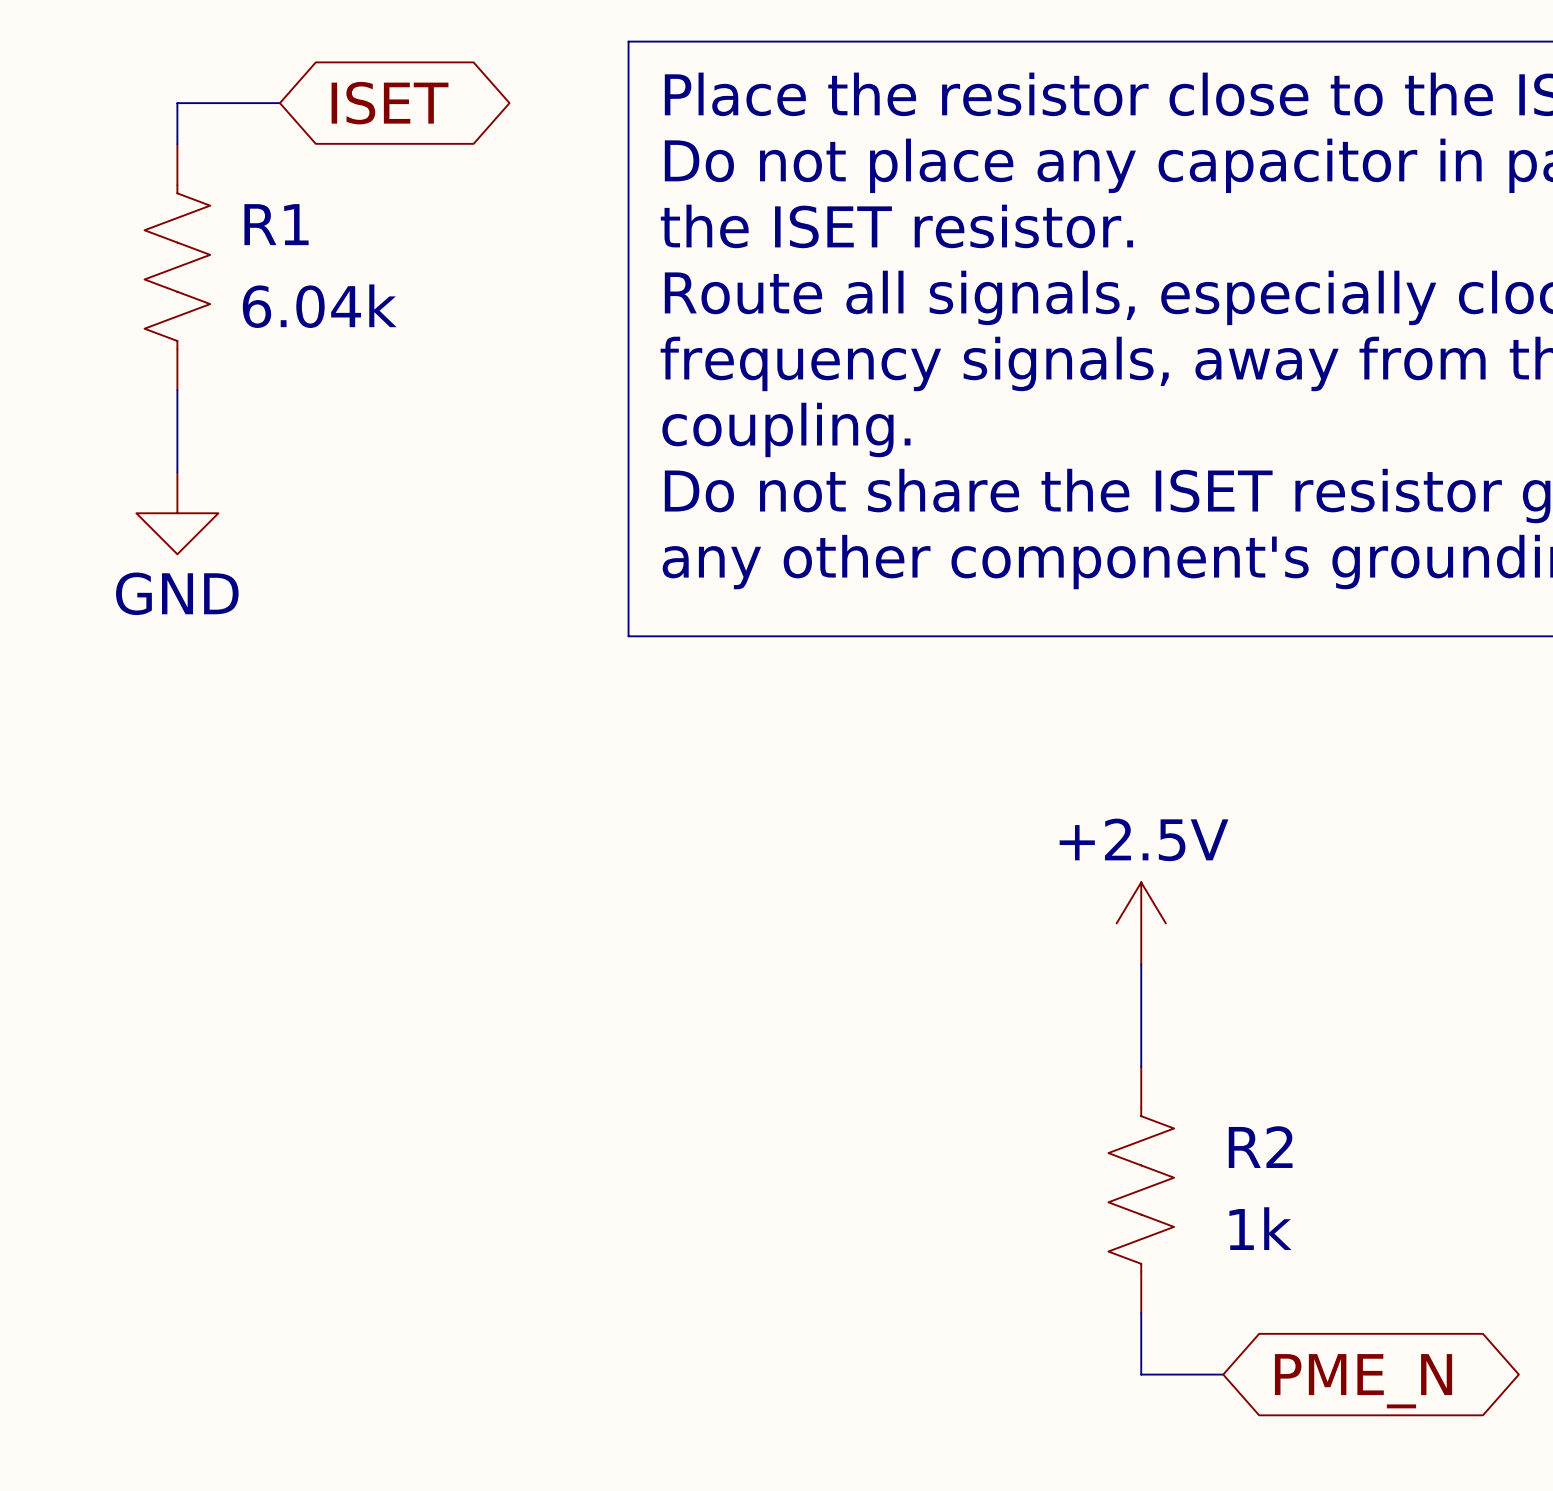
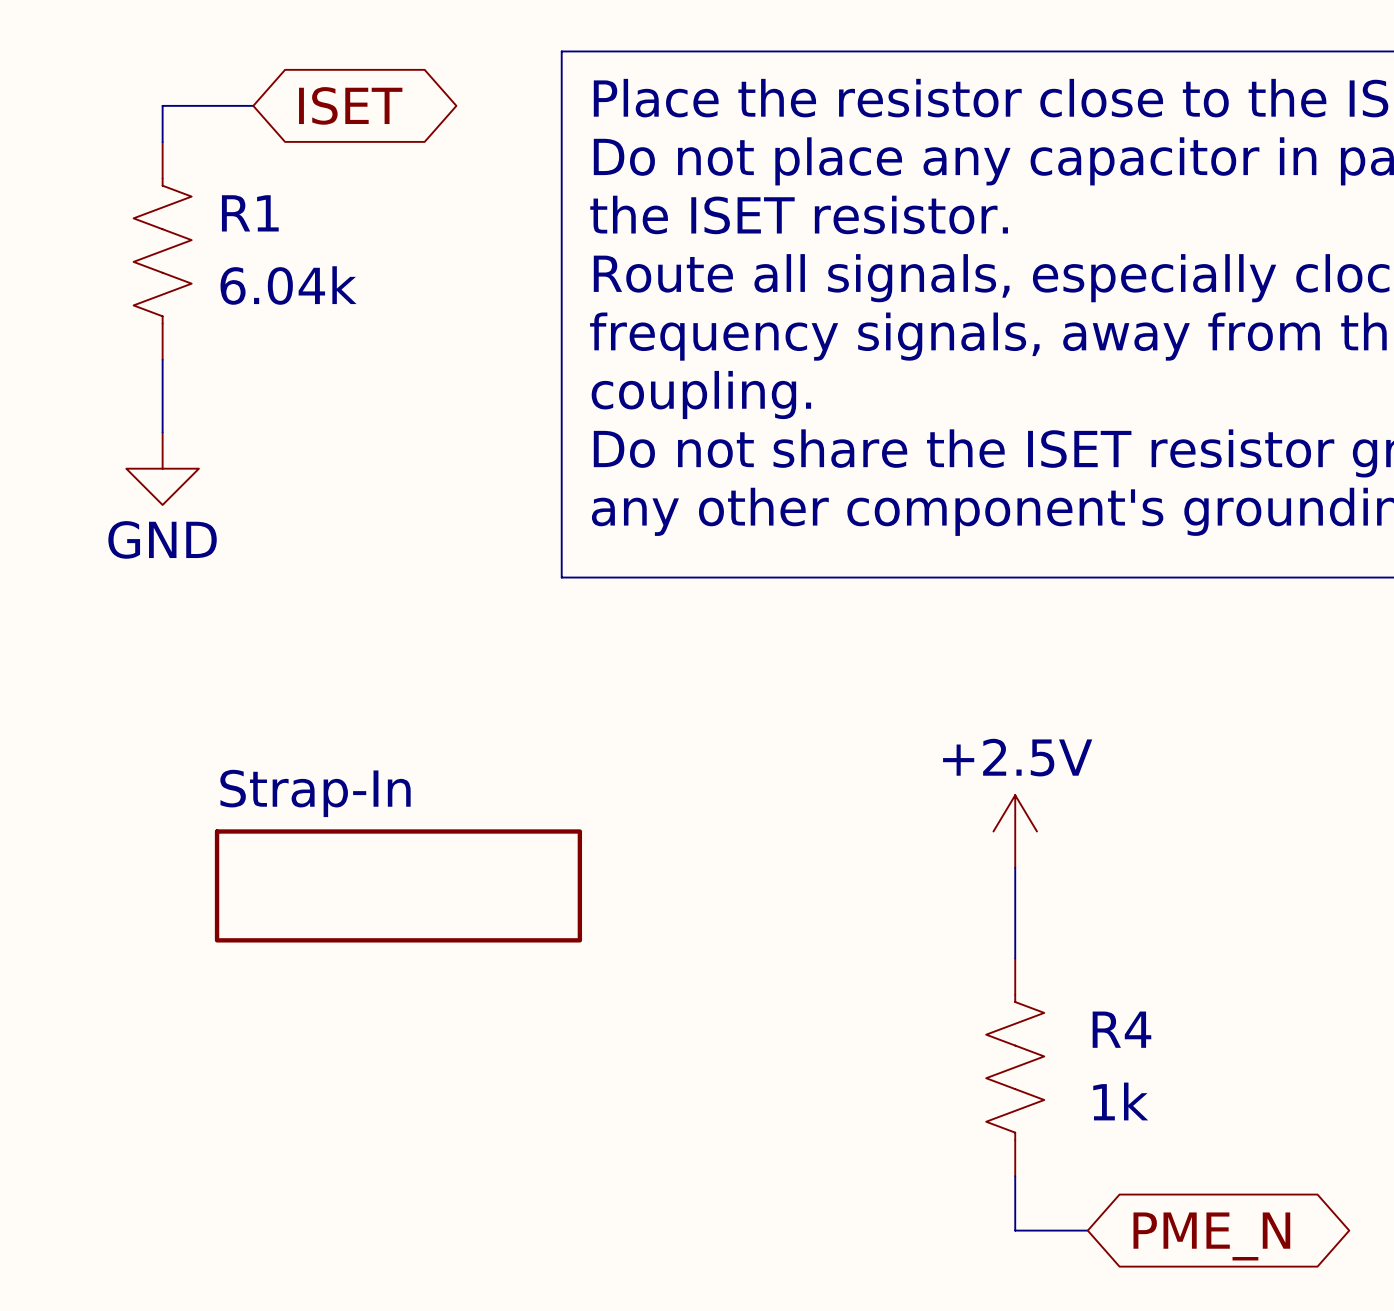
sheet Strap-In: none -> (398, 885)
R2 name: R2 (1260, 1147) -> R4 (1121, 1029)

